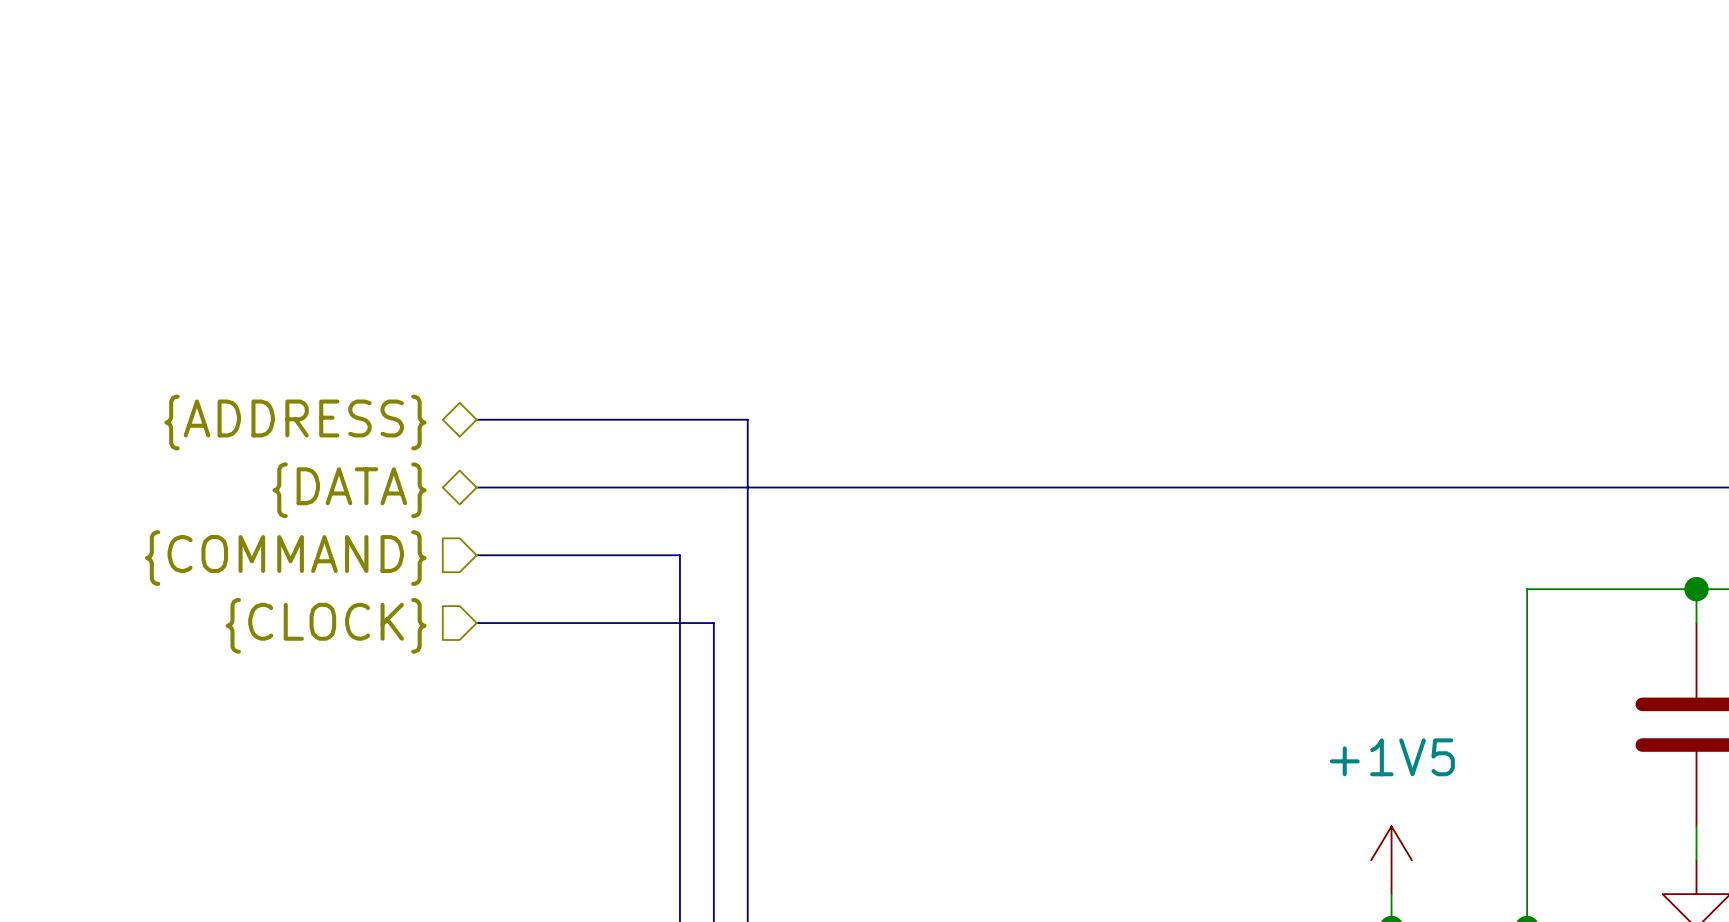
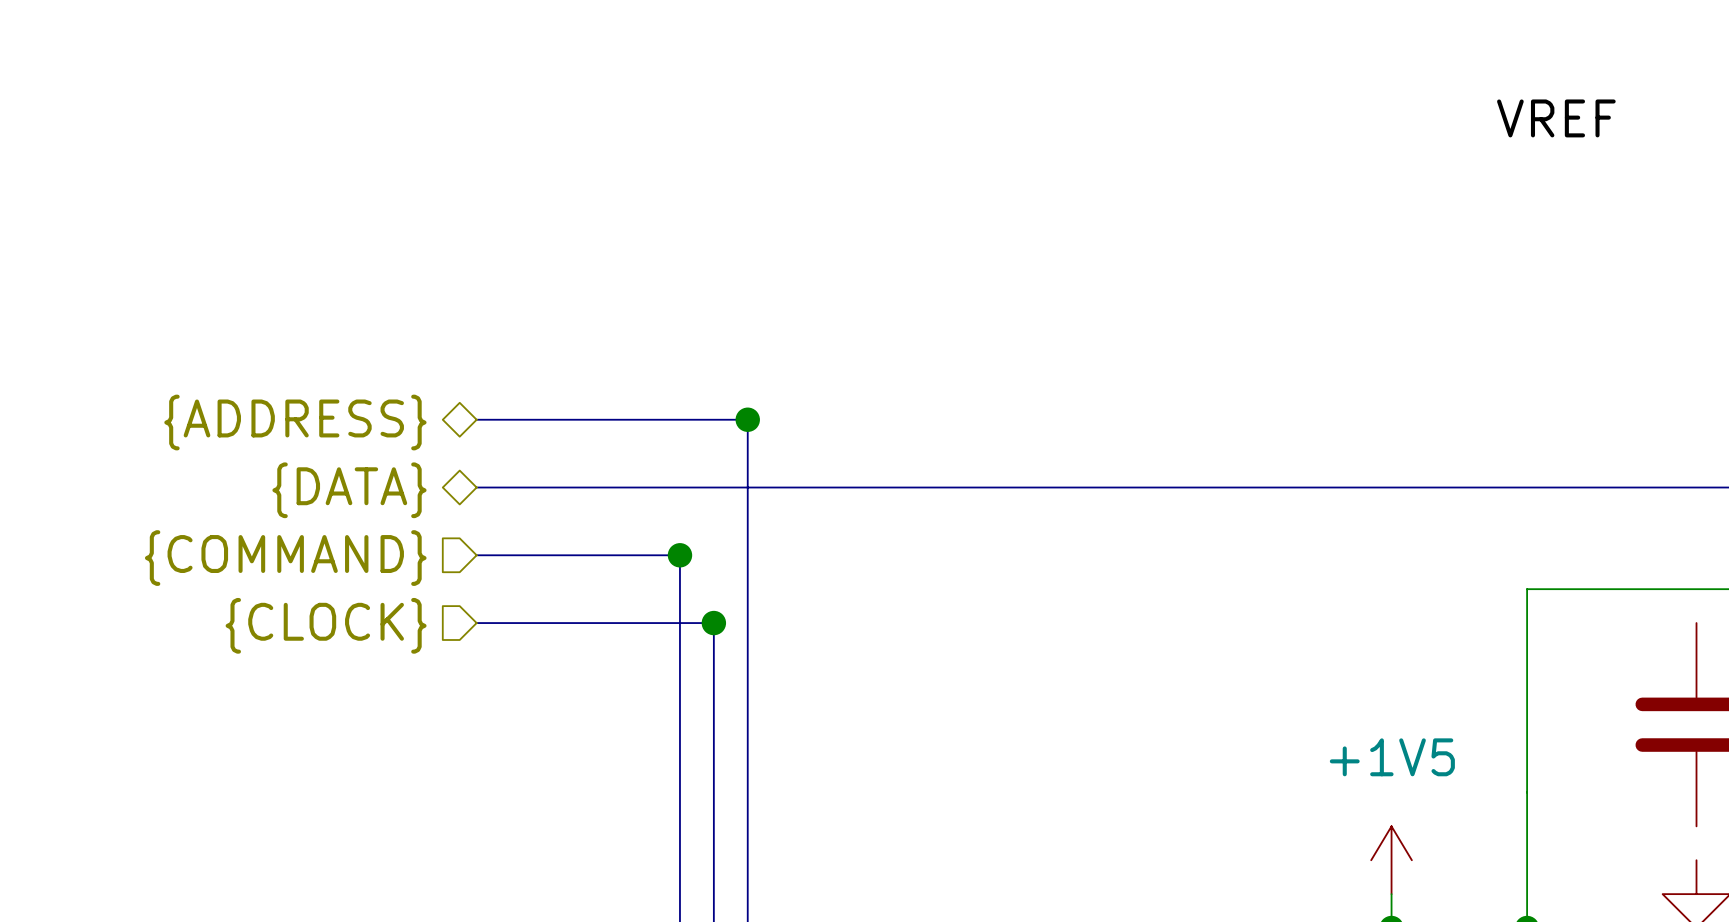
label: none -> VREF (1556, 118)
junction: none -> (747, 419)
junction: none -> (679, 555)
wire: (1696, 589) (1696, 623) -> none
junction: (1696, 589) -> none
junction: none -> (713, 623)
wire: (1696, 826) (1696, 860) -> none

